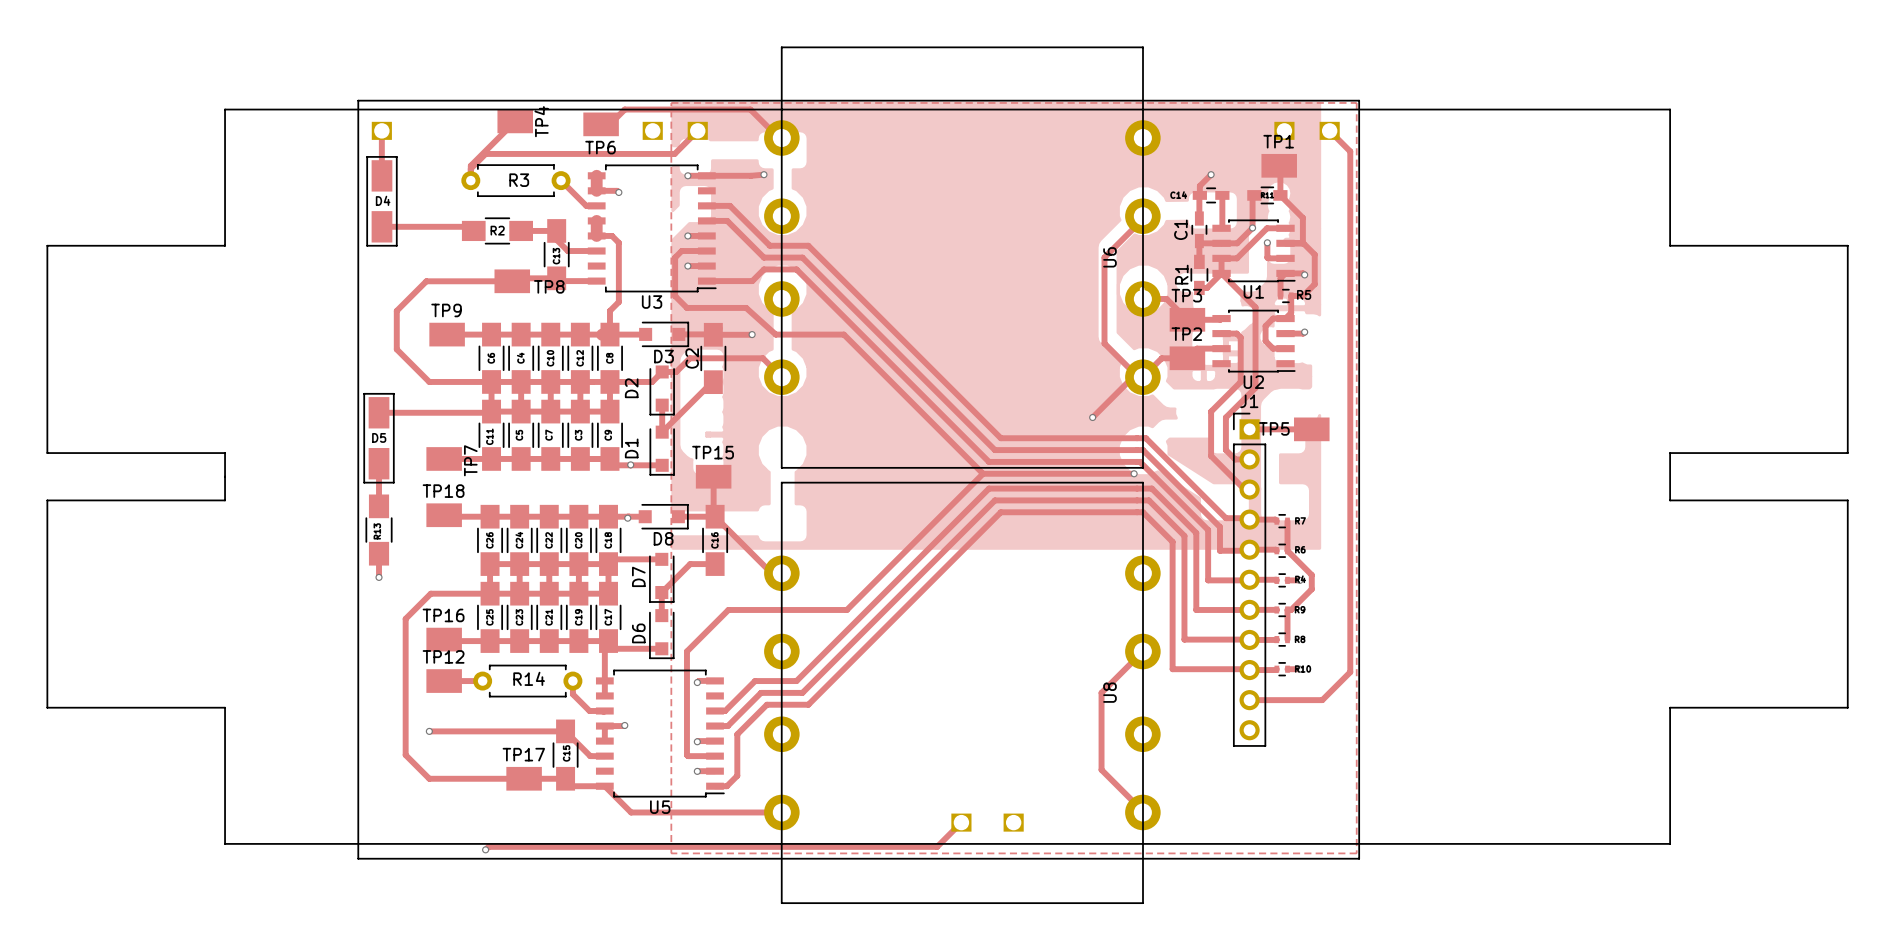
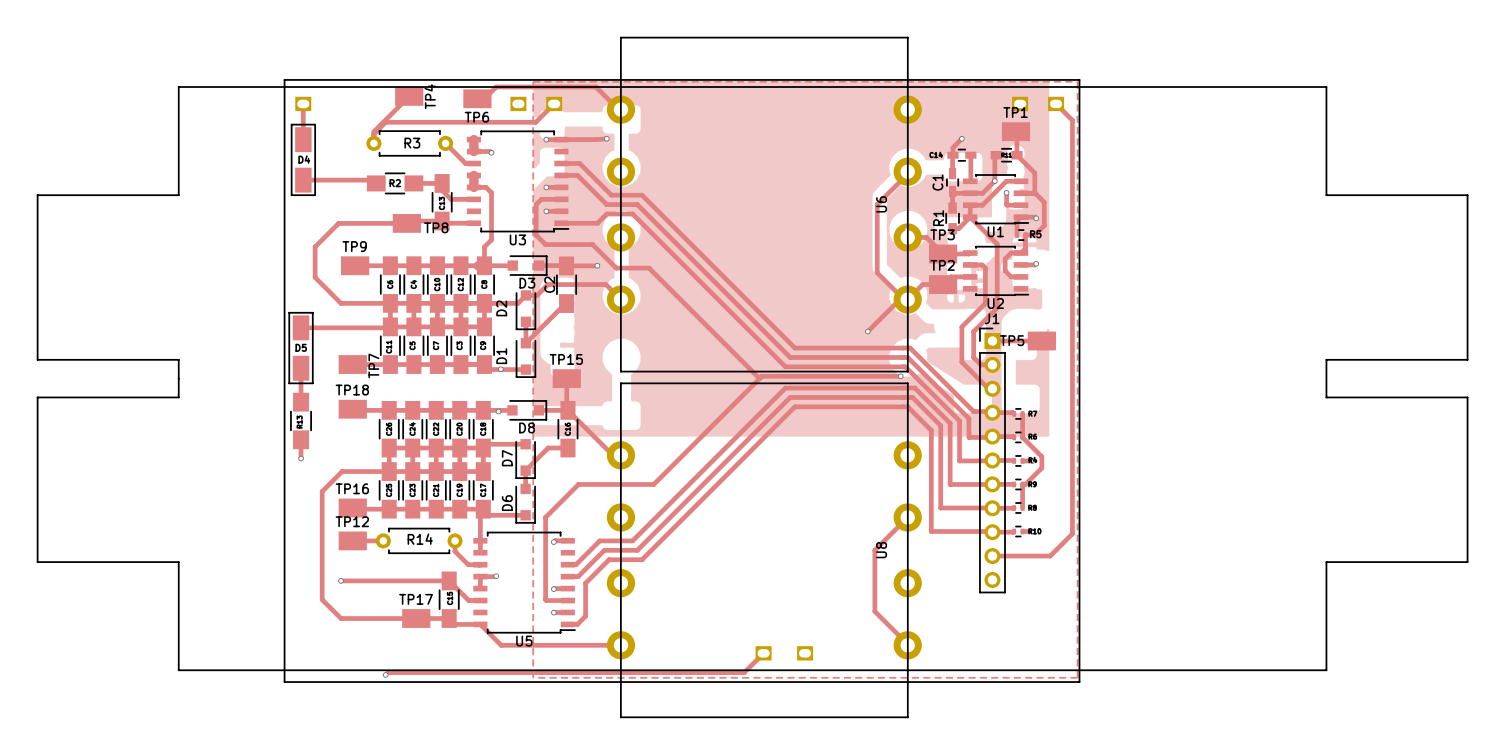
part footprint: [46, 108, 1849, 845] -> [36, 86, 1469, 671]
track: (746, 307) (775, 334) (843, 334) (983, 473) (846, 609) (823, 609) -> (592, 244) (616, 268) (649, 268) (759, 378)
track: none -> (780, 376) (761, 376) (653, 484)

